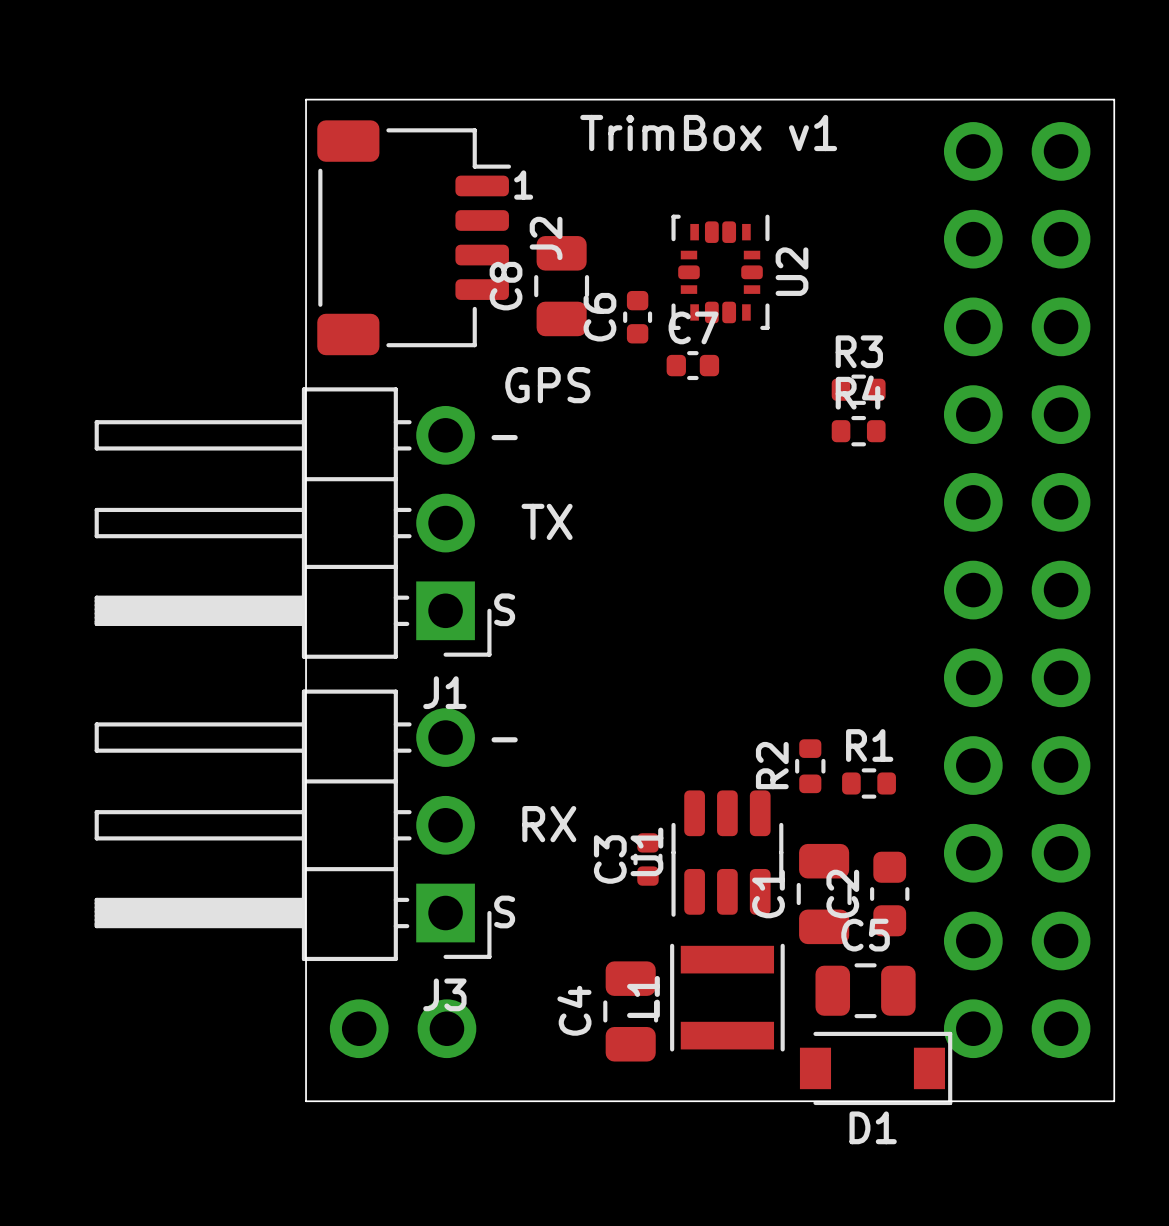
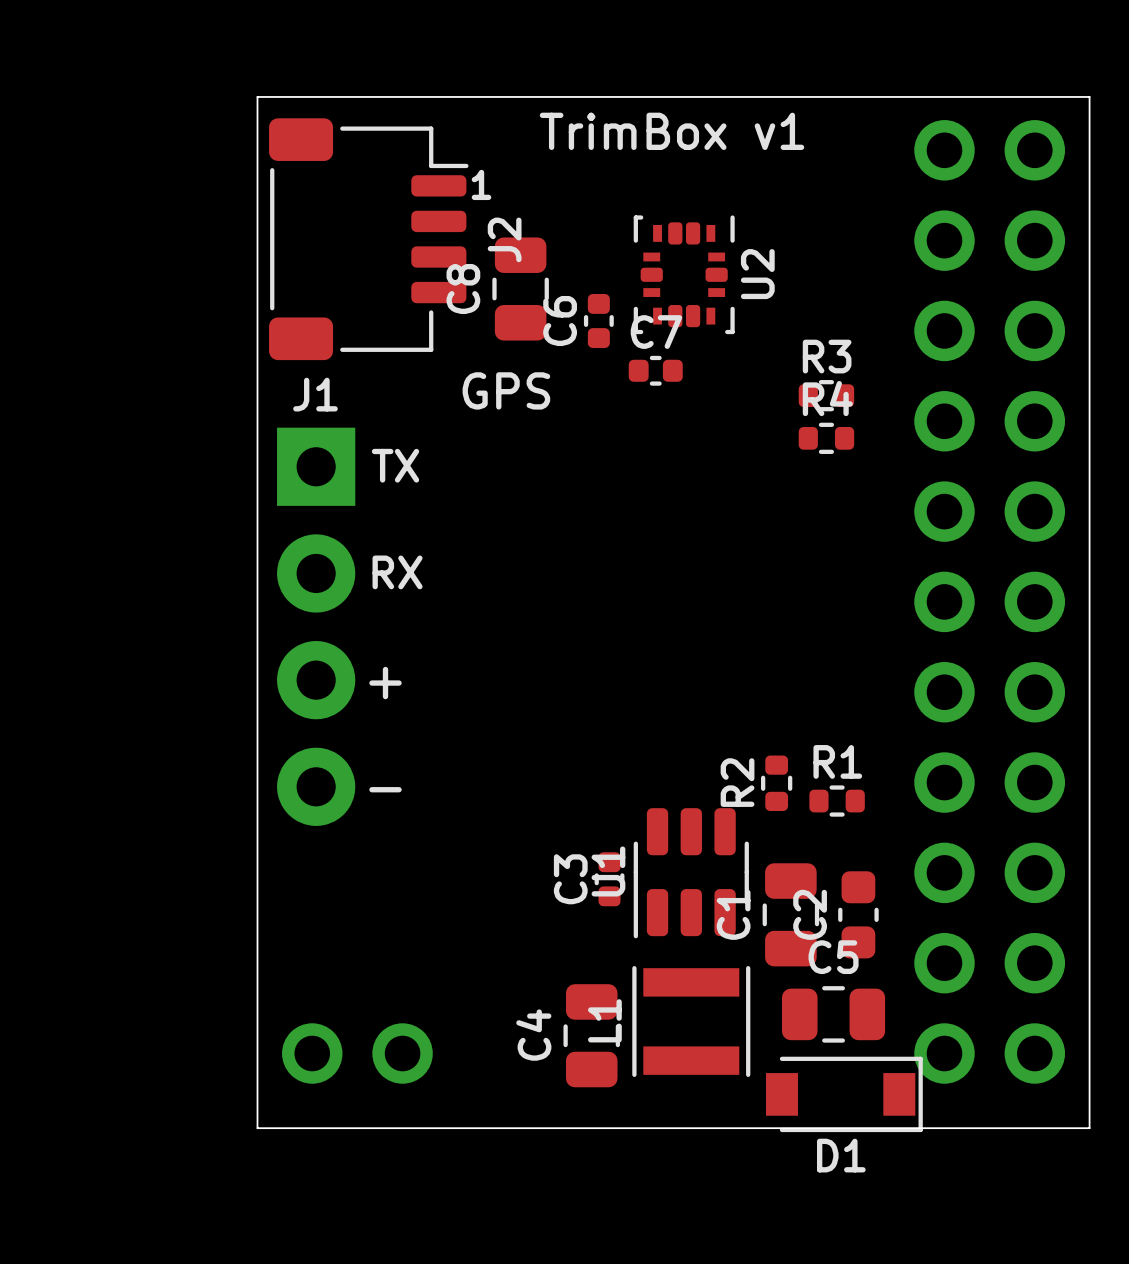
J1 footprint: [94, 387, 492, 659] -> [277, 427, 356, 826]
text: - (504, 437) -> none
text position: TX (547, 521) -> TX (395, 465)
text: S (504, 609) -> none
text: none -> + (385, 683)
J1 name position: J1 (444, 692) -> J1 (315, 394)
text position: - (504, 739) -> - (385, 789)
text position: RX (549, 824) -> RX (397, 572)
J3: (293, 825) -> none
text: S (504, 911) -> none

